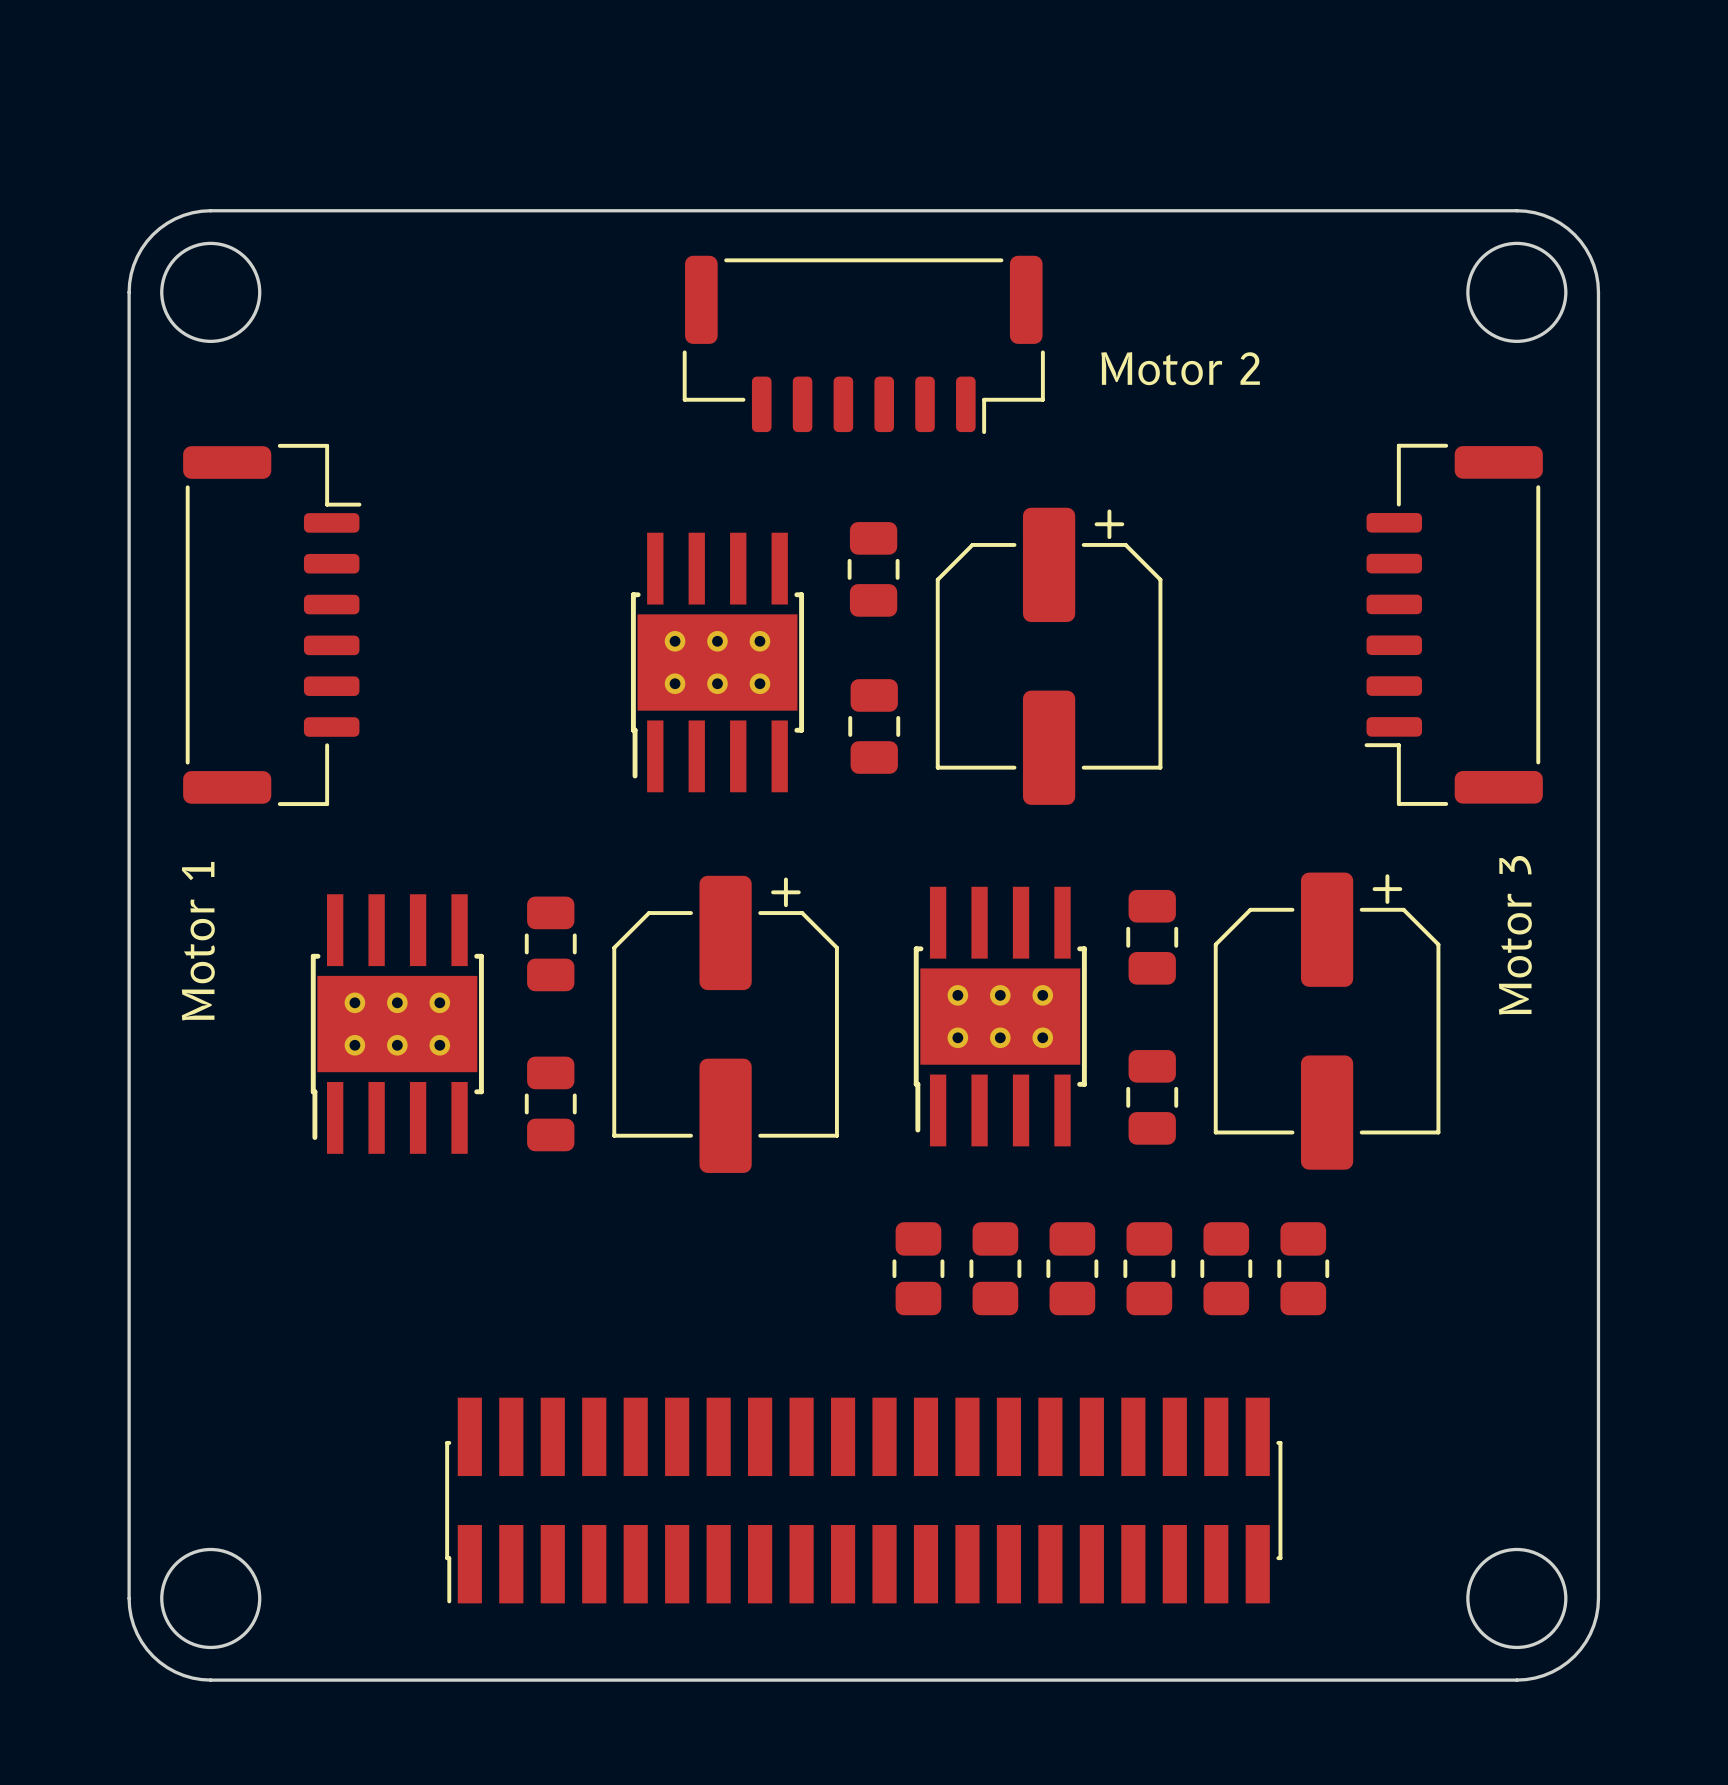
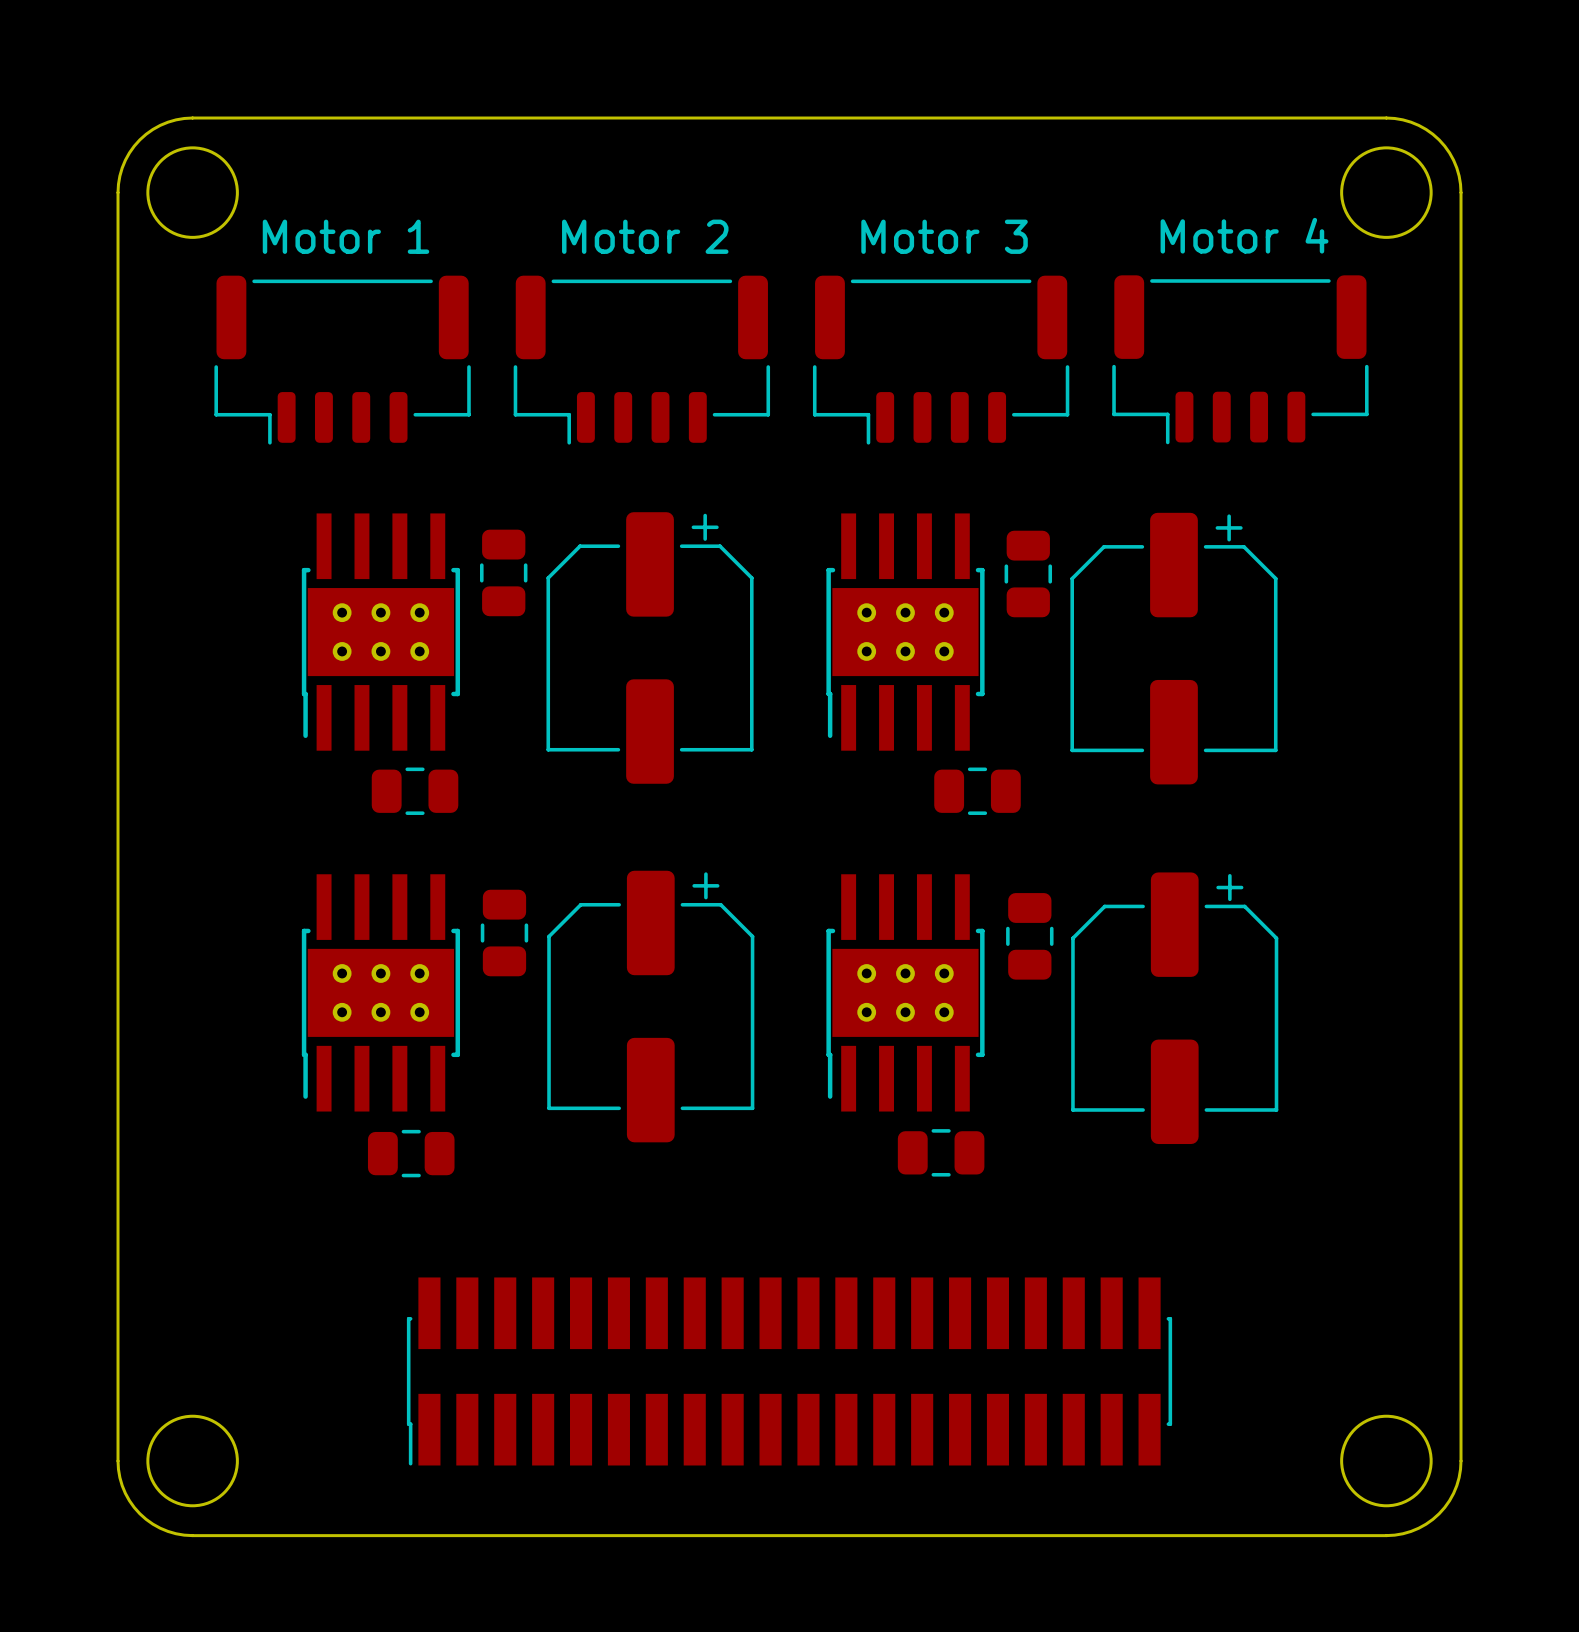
board edge: (129, 292) (131, 274) (137, 256) (153, 234) (175, 218) (192, 212) (210, 210) (1525, 211) (1552, 218) (1574, 234) (1590, 256) (1596, 274) (1598, 292) -> (118, 267) (118, 184) (125, 160) (139, 139) (152, 129) (176, 119) (192, 118) (1394, 118) (1411, 122) (1426, 129) (1439, 139) (1453, 160) (1460, 184) (1461, 267)
round board edge position: (210, 292) -> (192, 192)
round board edge position: (1516, 292) -> (1386, 192)
part: Motor 2 (863, 344) -> none
part: none -> Motor 4 (1240, 359)
part: none -> Motor 1 (342, 360)
part: none -> Motor 2 (641, 360)
part: none -> Motor 3 (941, 360)
part: (873, 569) -> none
part: Motor 1 (272, 624) -> none
part: Motor 3 (1453, 624) -> none
part: none -> (503, 572)
part: none -> (1028, 573)
part: (1049, 656) -> none
part: (717, 662) -> none
part: none -> (380, 632)
part: none -> (905, 632)
part: none -> (650, 647)
part: none -> (1173, 648)
part: (874, 726) -> none
part: none -> (415, 791)
part: none -> (977, 791)
part: (1152, 937) -> none
part: (550, 943) -> none
part position: (1000, 1016) -> (905, 992)
part: none -> (504, 933)
part position: (1327, 1021) -> (1174, 1008)
part position: (397, 1024) -> (380, 992)
part position: (725, 1024) -> (650, 1006)
part: none -> (1029, 936)
part: (1152, 1097) -> none
part: (550, 1103) -> none
part: none -> (941, 1152)
part: none -> (411, 1153)
part: (918, 1268) -> none
part: (995, 1268) -> none
part: (1072, 1268) -> none
part: (1149, 1268) -> none
part: (1226, 1268) -> none
part: (1303, 1268) -> none

